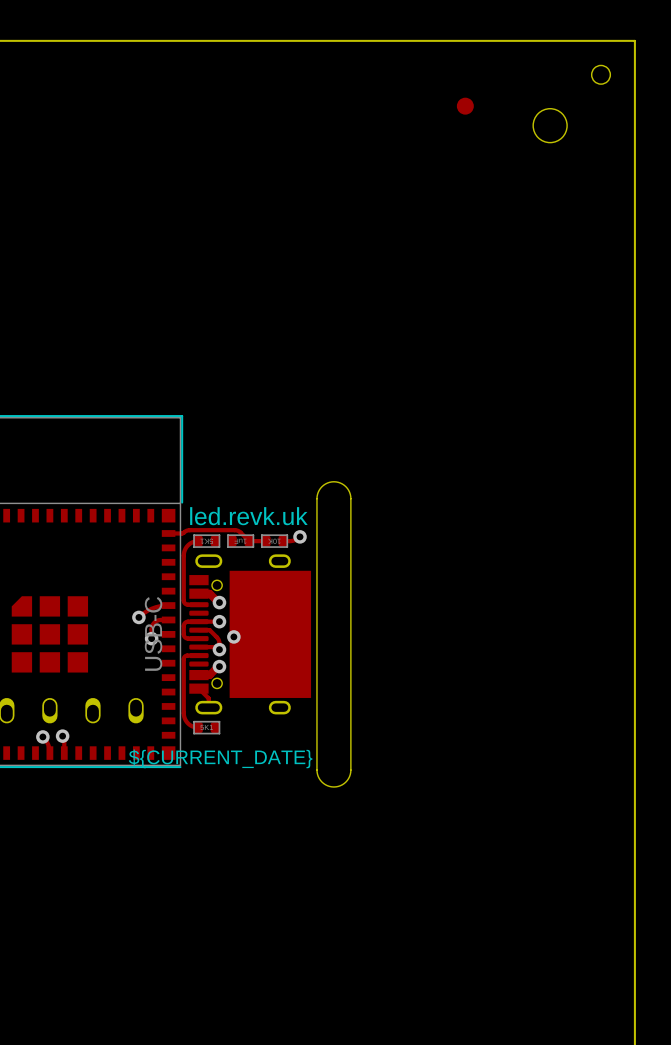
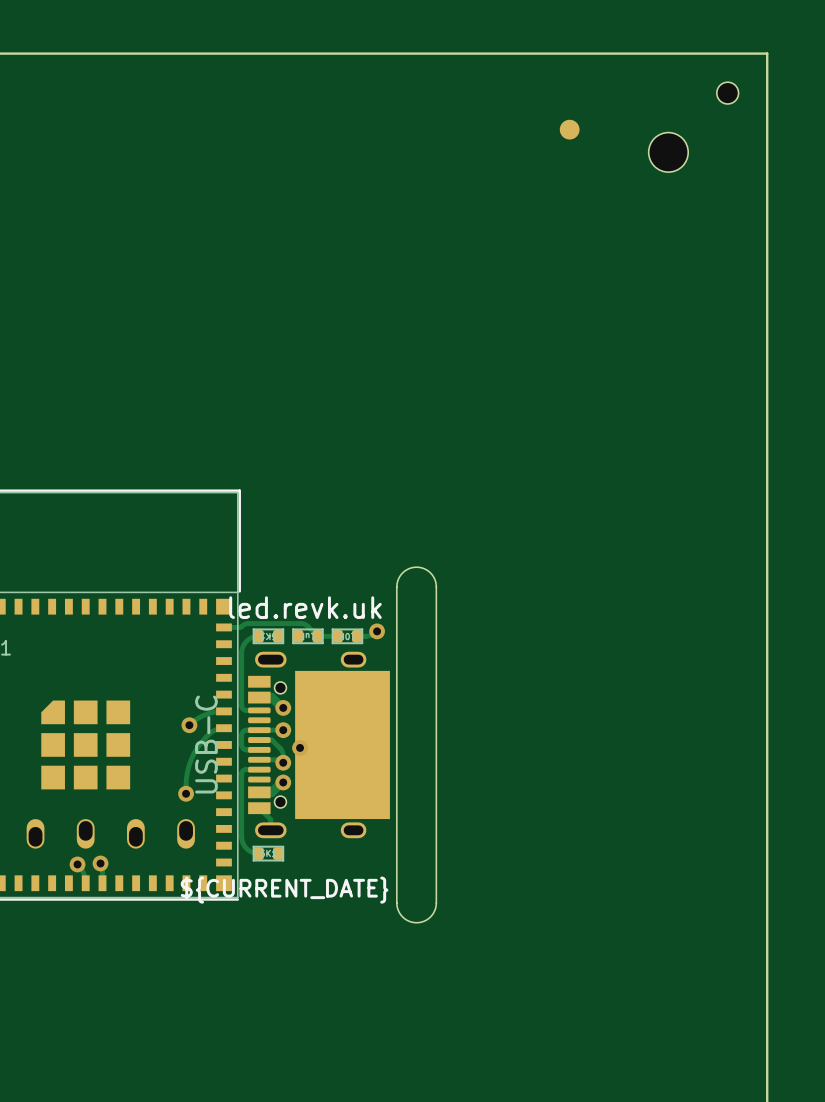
track: (168, 619) (158, 620) (154, 622) (151, 627) (151, 638) -> (223, 728) (210, 733) (194, 753) (187, 772) (186, 793)
via position: (151, 638) -> (186, 793)

